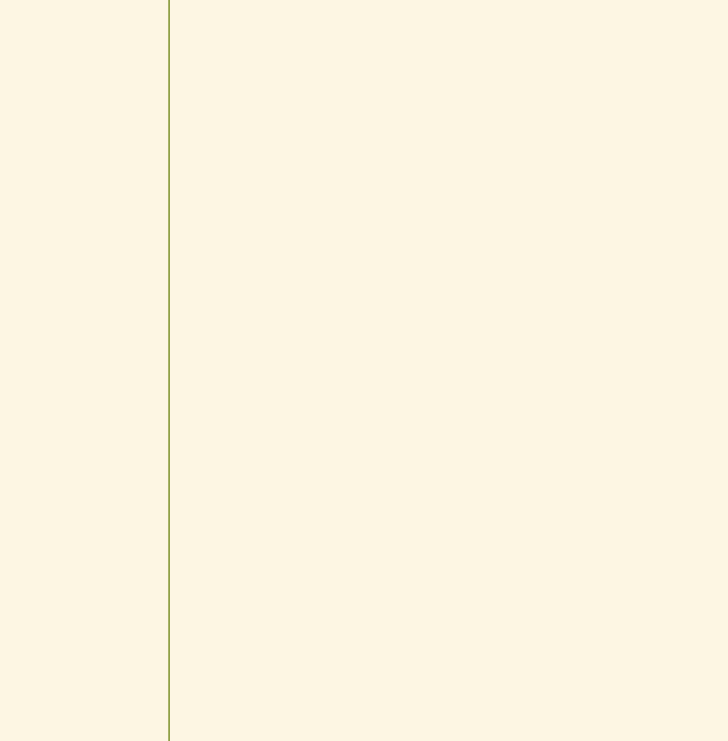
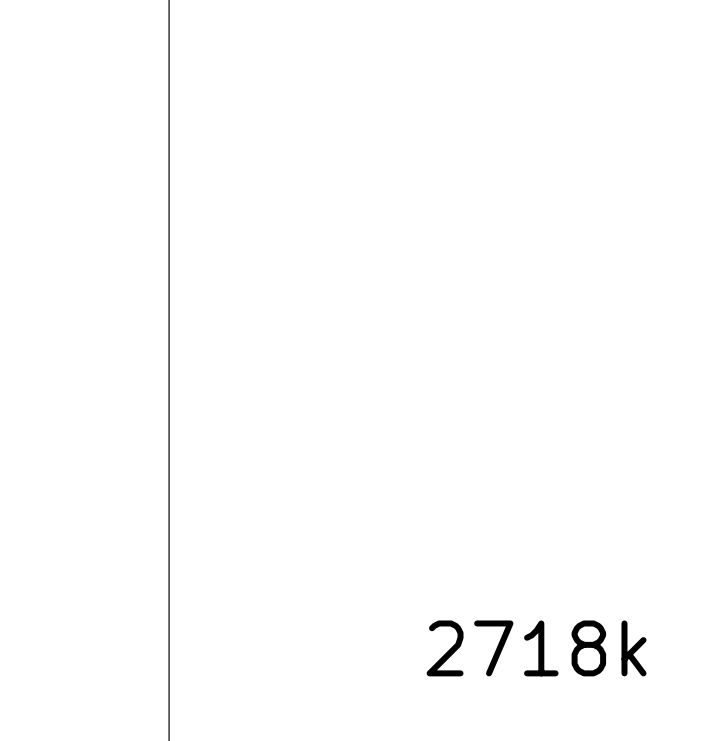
text: none -> 2718k (536, 648)

